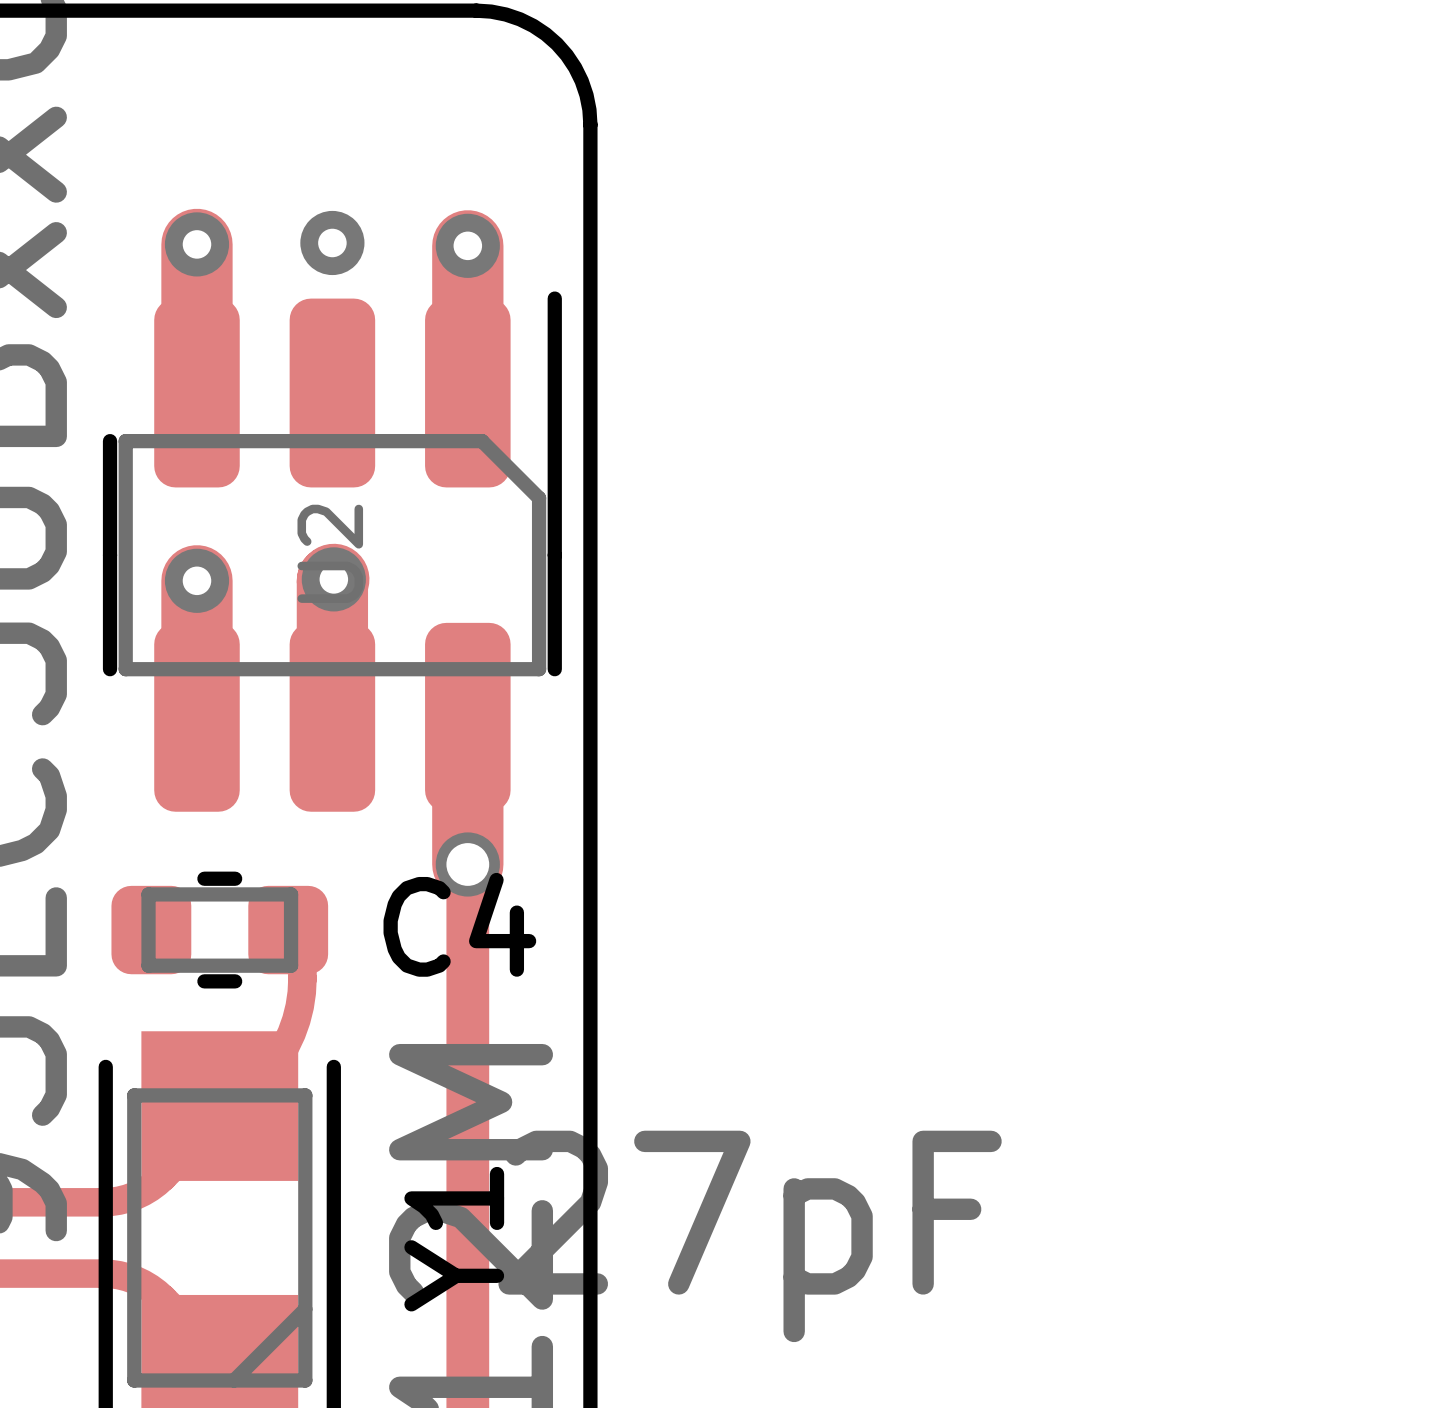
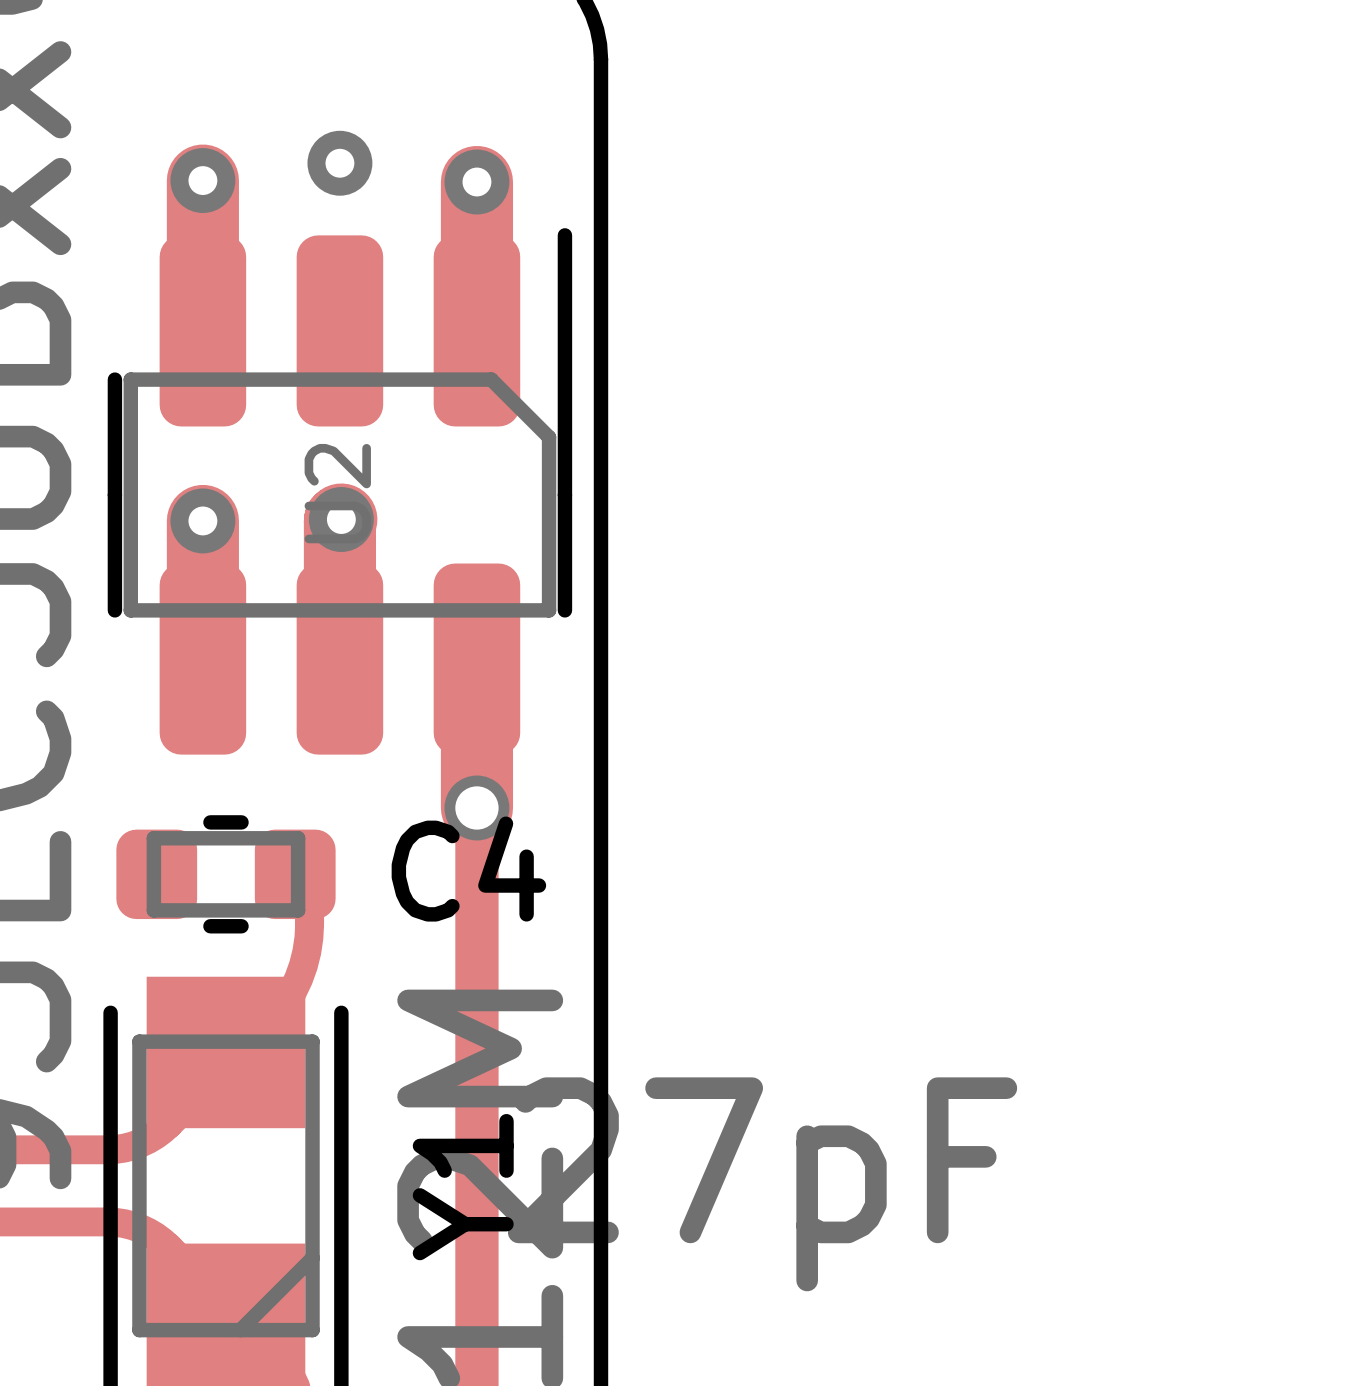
via position: (332, 242) -> (339, 163)

